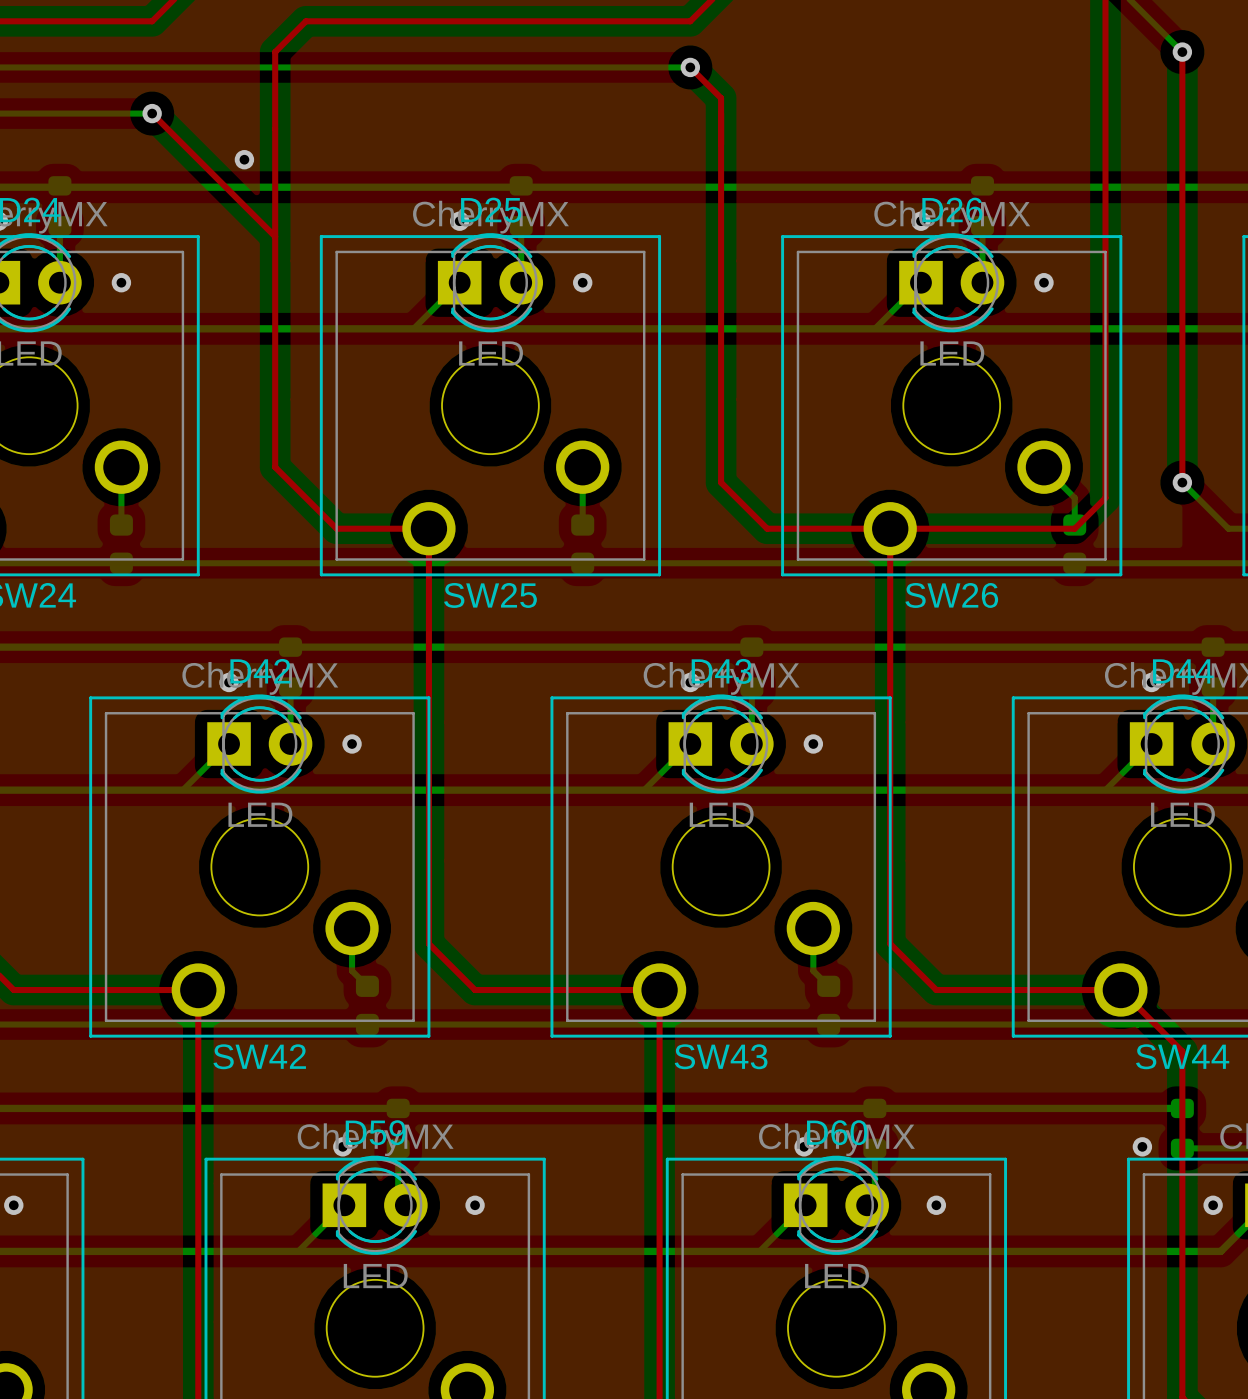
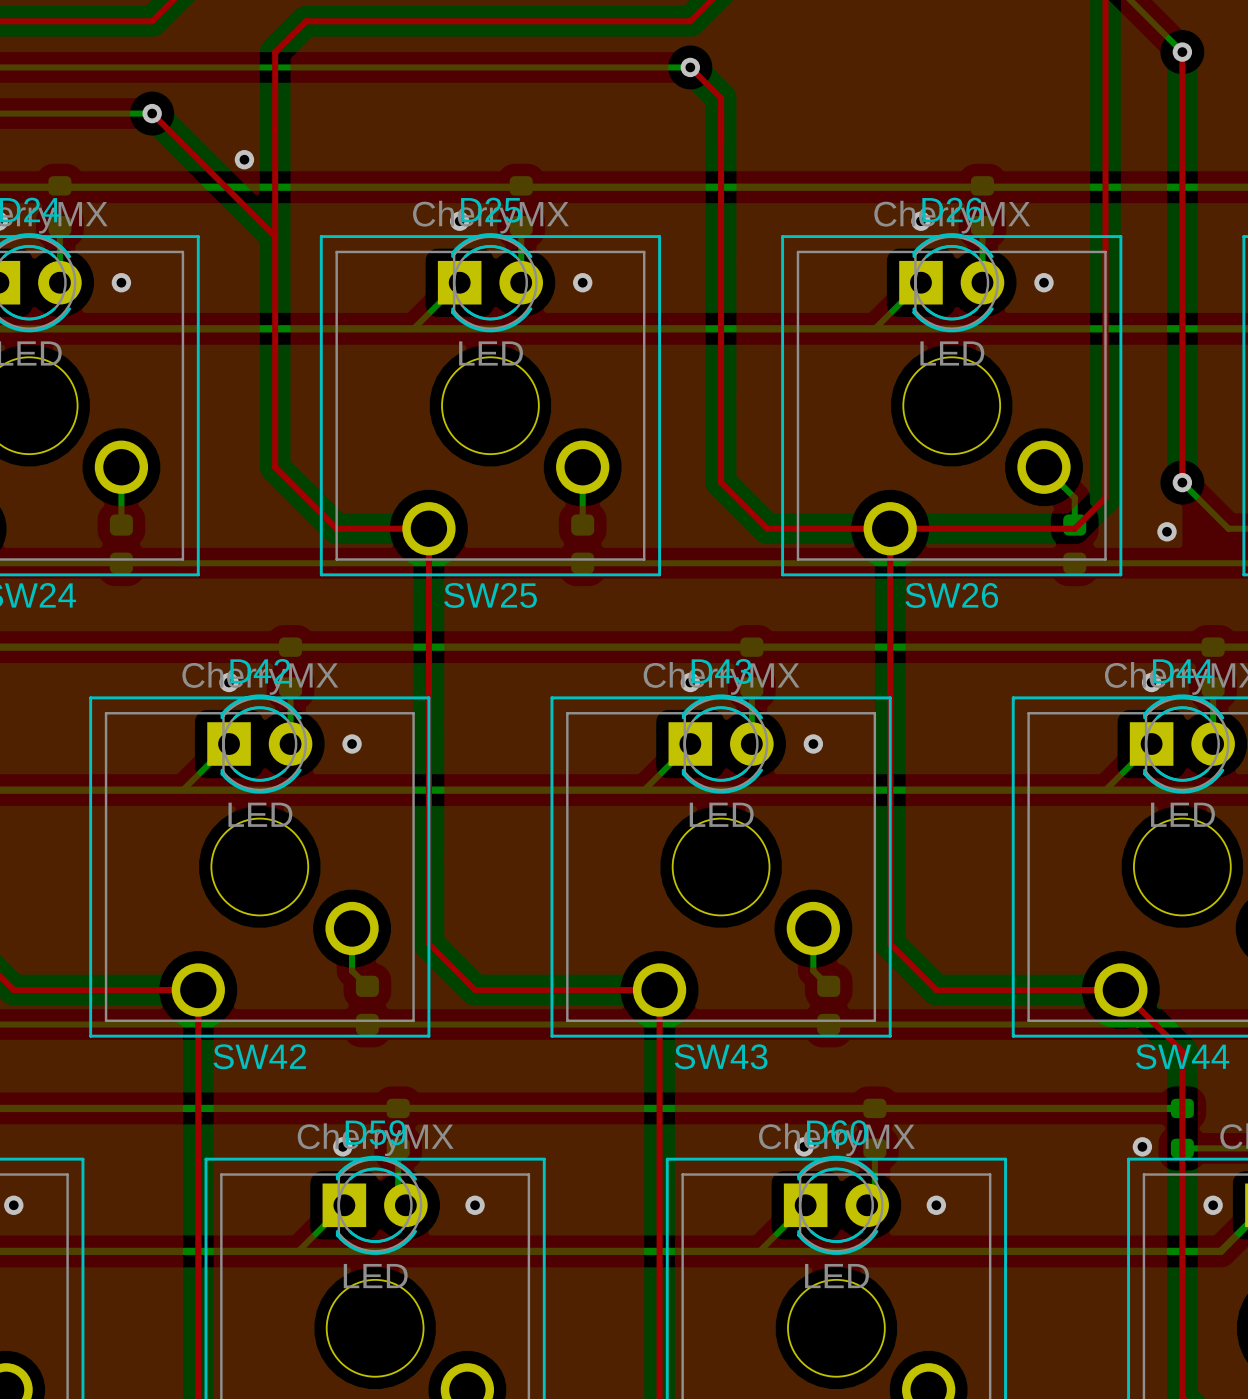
via: none -> (1166, 531)

